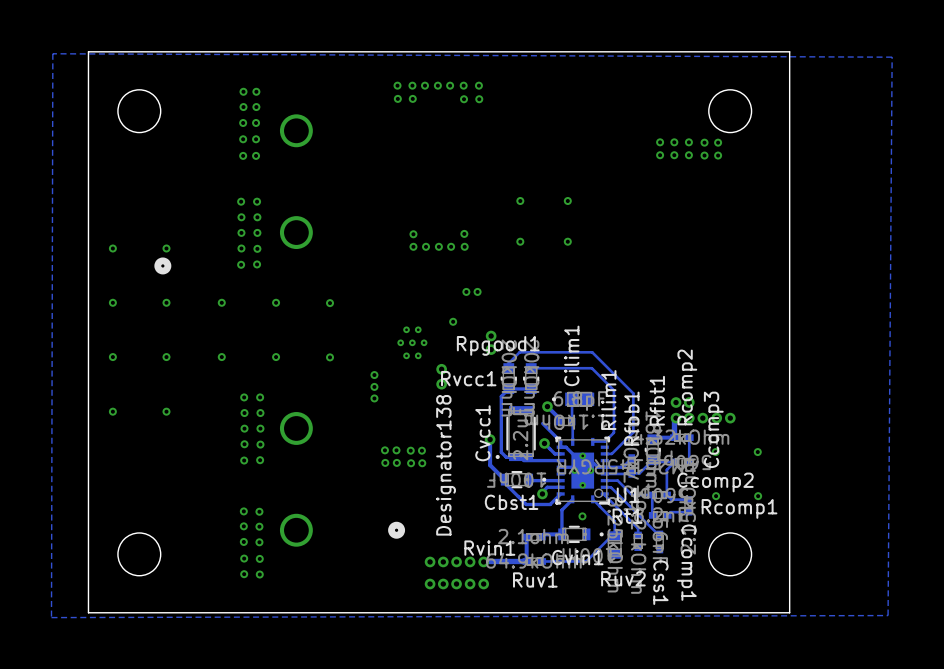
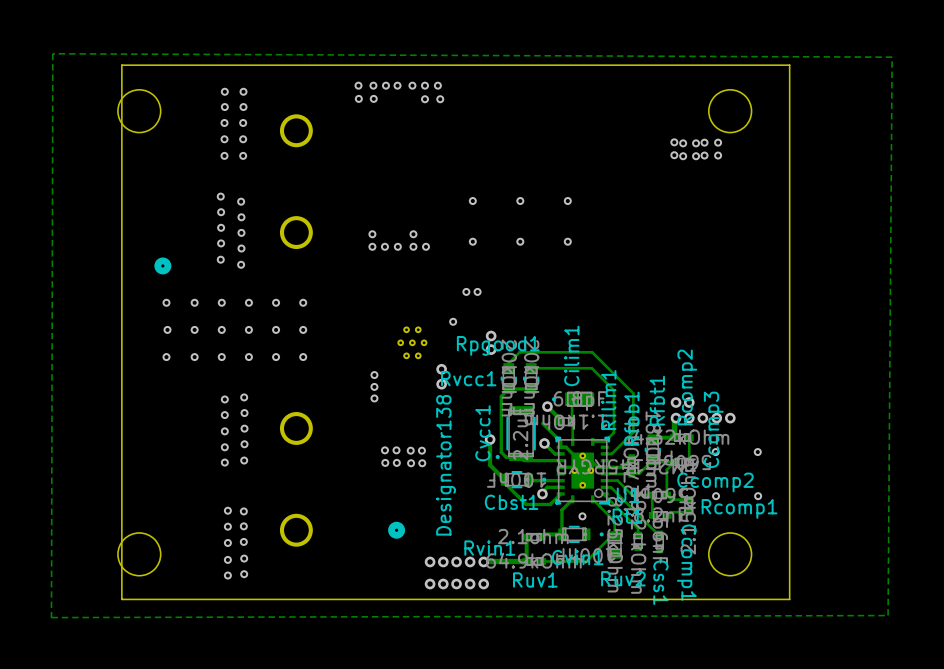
board edge: (789, 65) (789, 51) (88, 51) (88, 612) (789, 612) (789, 599) -> (789, 65) (121, 65) (121, 599) (789, 599)
via: none -> (358, 85)
via: none -> (373, 85)
via: none -> (385, 85)
via: (450, 85) -> none
via: (463, 85) -> none
via: (478, 85) -> none
via: none -> (224, 91)
via: (256, 91) -> none
via: none -> (358, 98)
via: none -> (373, 98)
via: (397, 98) -> none
via position: (412, 98) -> (424, 99)
via: none -> (440, 99)
via: (464, 99) -> none
via: (479, 99) -> none
via: none -> (224, 107)
via: (256, 107) -> none
via: none -> (224, 122)
via: (256, 122) -> none
via: none -> (224, 139)
via: (256, 139) -> none
via: (660, 142) -> none
via: (688, 142) -> none
via: none -> (683, 143)
via: none -> (696, 143)
via: none -> (224, 155)
via: (256, 155) -> none
via: (660, 155) -> none
via: (688, 155) -> none
via: none -> (683, 156)
via: none -> (696, 156)
via: none -> (220, 196)
via: (257, 201) -> none
via: none -> (472, 201)
via: none -> (221, 212)
via: (257, 217) -> none
via: none -> (221, 227)
via: (257, 232) -> none
via: (464, 233) -> none
via: none -> (372, 234)
via: none -> (472, 241)
via: none -> (221, 243)
via: none -> (372, 246)
via: none -> (384, 246)
via: none -> (397, 246)
via: (438, 246) -> none
via: (451, 246) -> none
via: (464, 246) -> none
via: (112, 248) -> none
via: (166, 248) -> none
via: (257, 248) -> none
via: none -> (220, 259)
via: (257, 264) -> none
via: (112, 302) -> none
via: none -> (194, 302)
via: none -> (248, 302)
via: none -> (303, 302)
via: (330, 303) -> none
via: none -> (167, 329)
via: none -> (194, 329)
via: none -> (221, 329)
via: none -> (248, 329)
via: none -> (276, 329)
via: none -> (303, 329)
via: (112, 357) -> none
via: none -> (194, 357)
via: none -> (248, 357)
via: none -> (303, 357)
via: (330, 357) -> none
via: (260, 397) -> none
via: none -> (224, 399)
via: (112, 411) -> none
via: (166, 411) -> none
via: (260, 413) -> none
via: none -> (224, 415)
via: (260, 428) -> none
via: none -> (224, 431)
via: (260, 444) -> none
via: none -> (224, 447)
via: (260, 460) -> none
via: none -> (224, 462)
via: none -> (227, 510)
via: (259, 511) -> none
via: none -> (227, 526)
via: (259, 526) -> none
via: none -> (227, 542)
via: (259, 542) -> none
via: (259, 558) -> none
via: none -> (227, 559)
via: (259, 574) -> none
via: none -> (227, 575)

